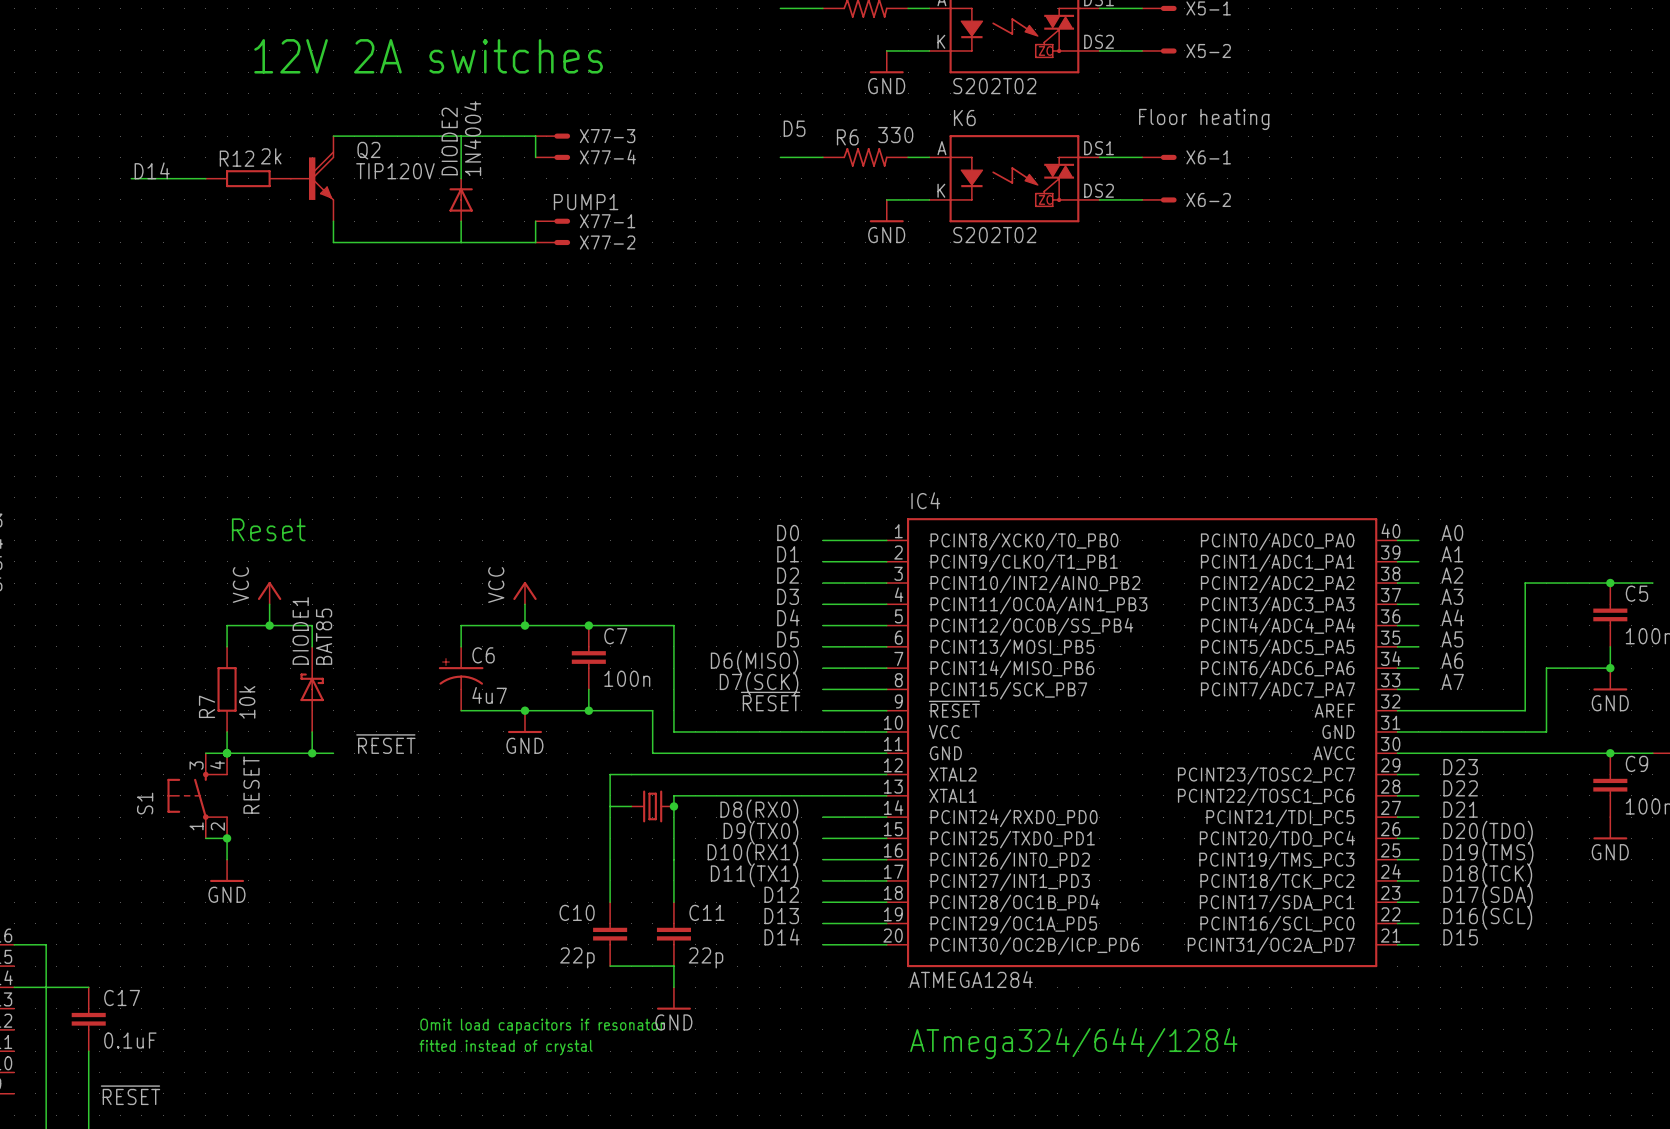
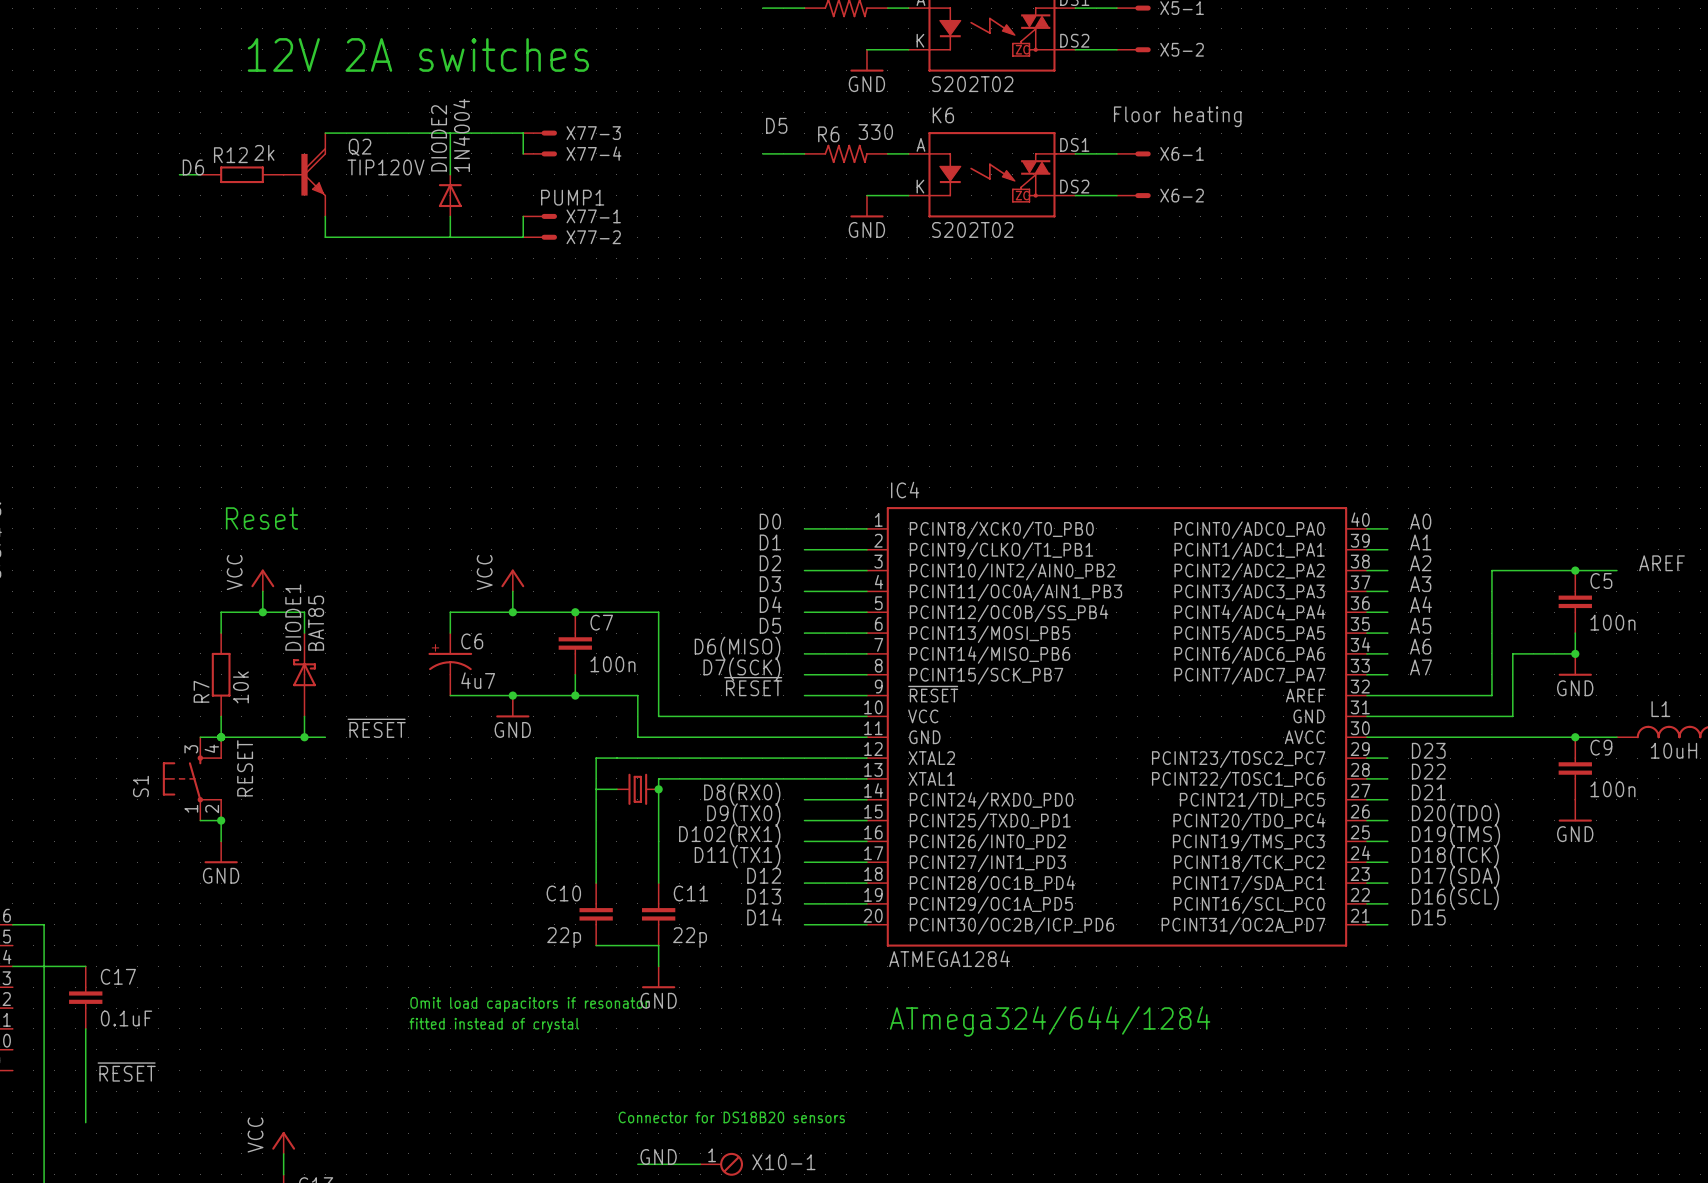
label: D14 (152, 170) -> none
label: none -> D6 (193, 167)
wire: (131, 178) (184, 178) -> none
label: D10(RX1) (752, 853) -> D102(RX1) (729, 835)

